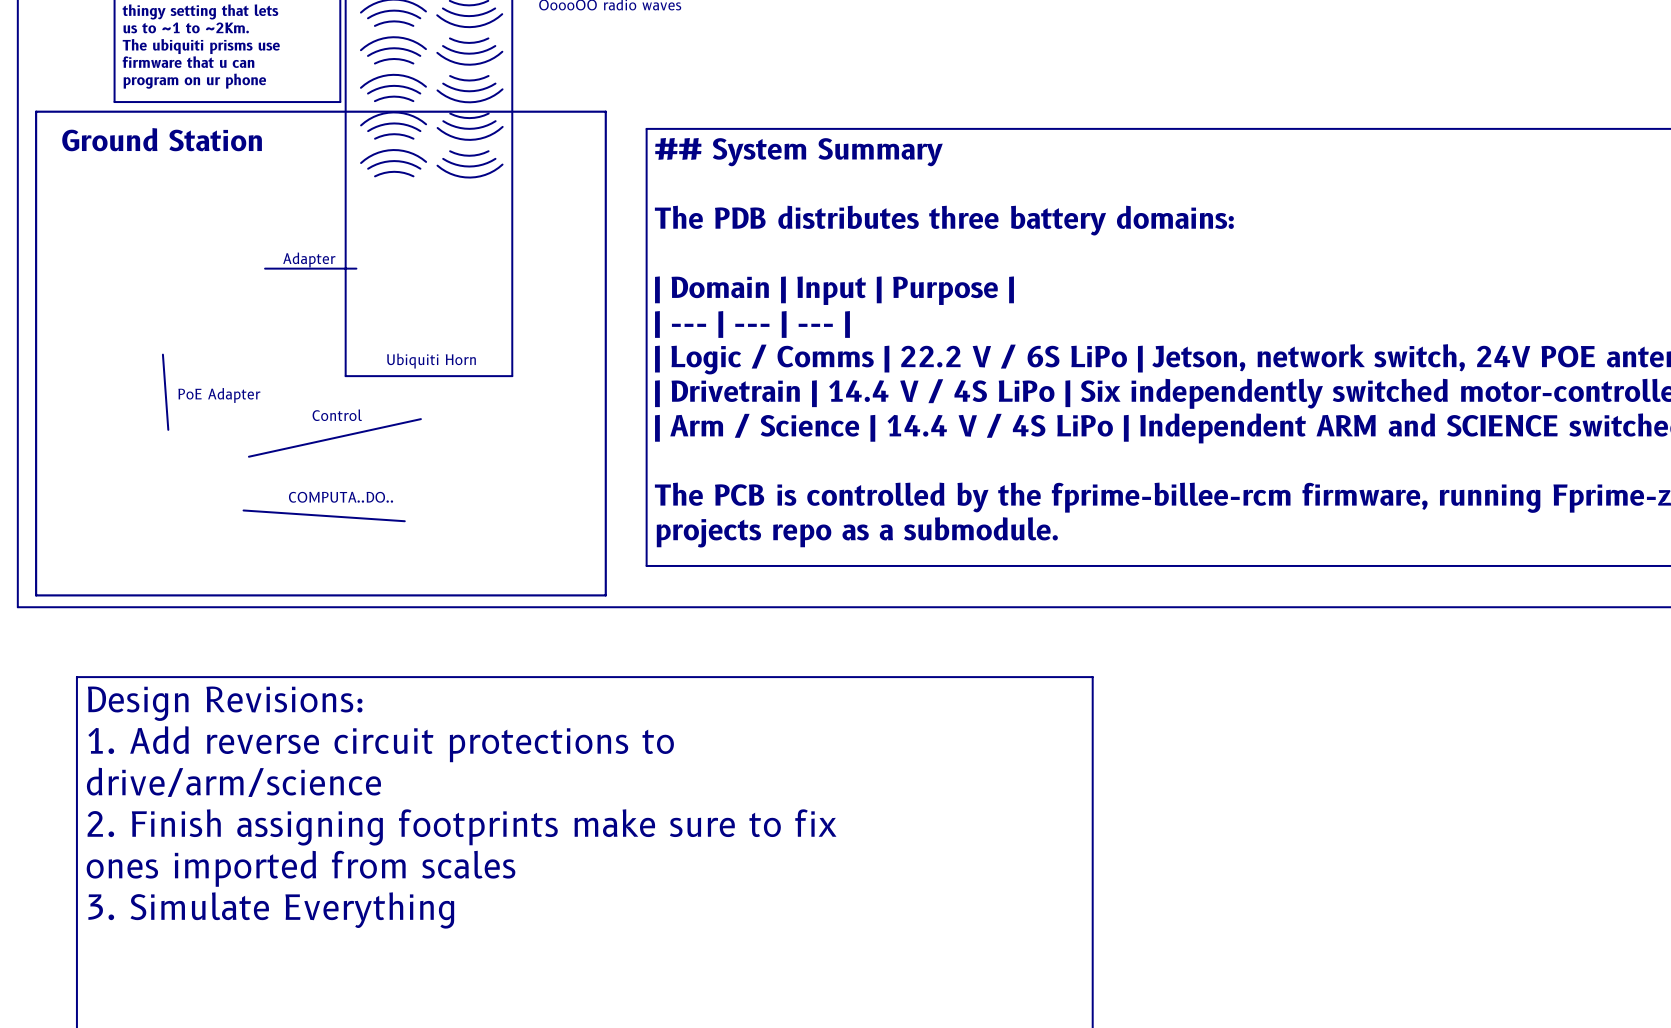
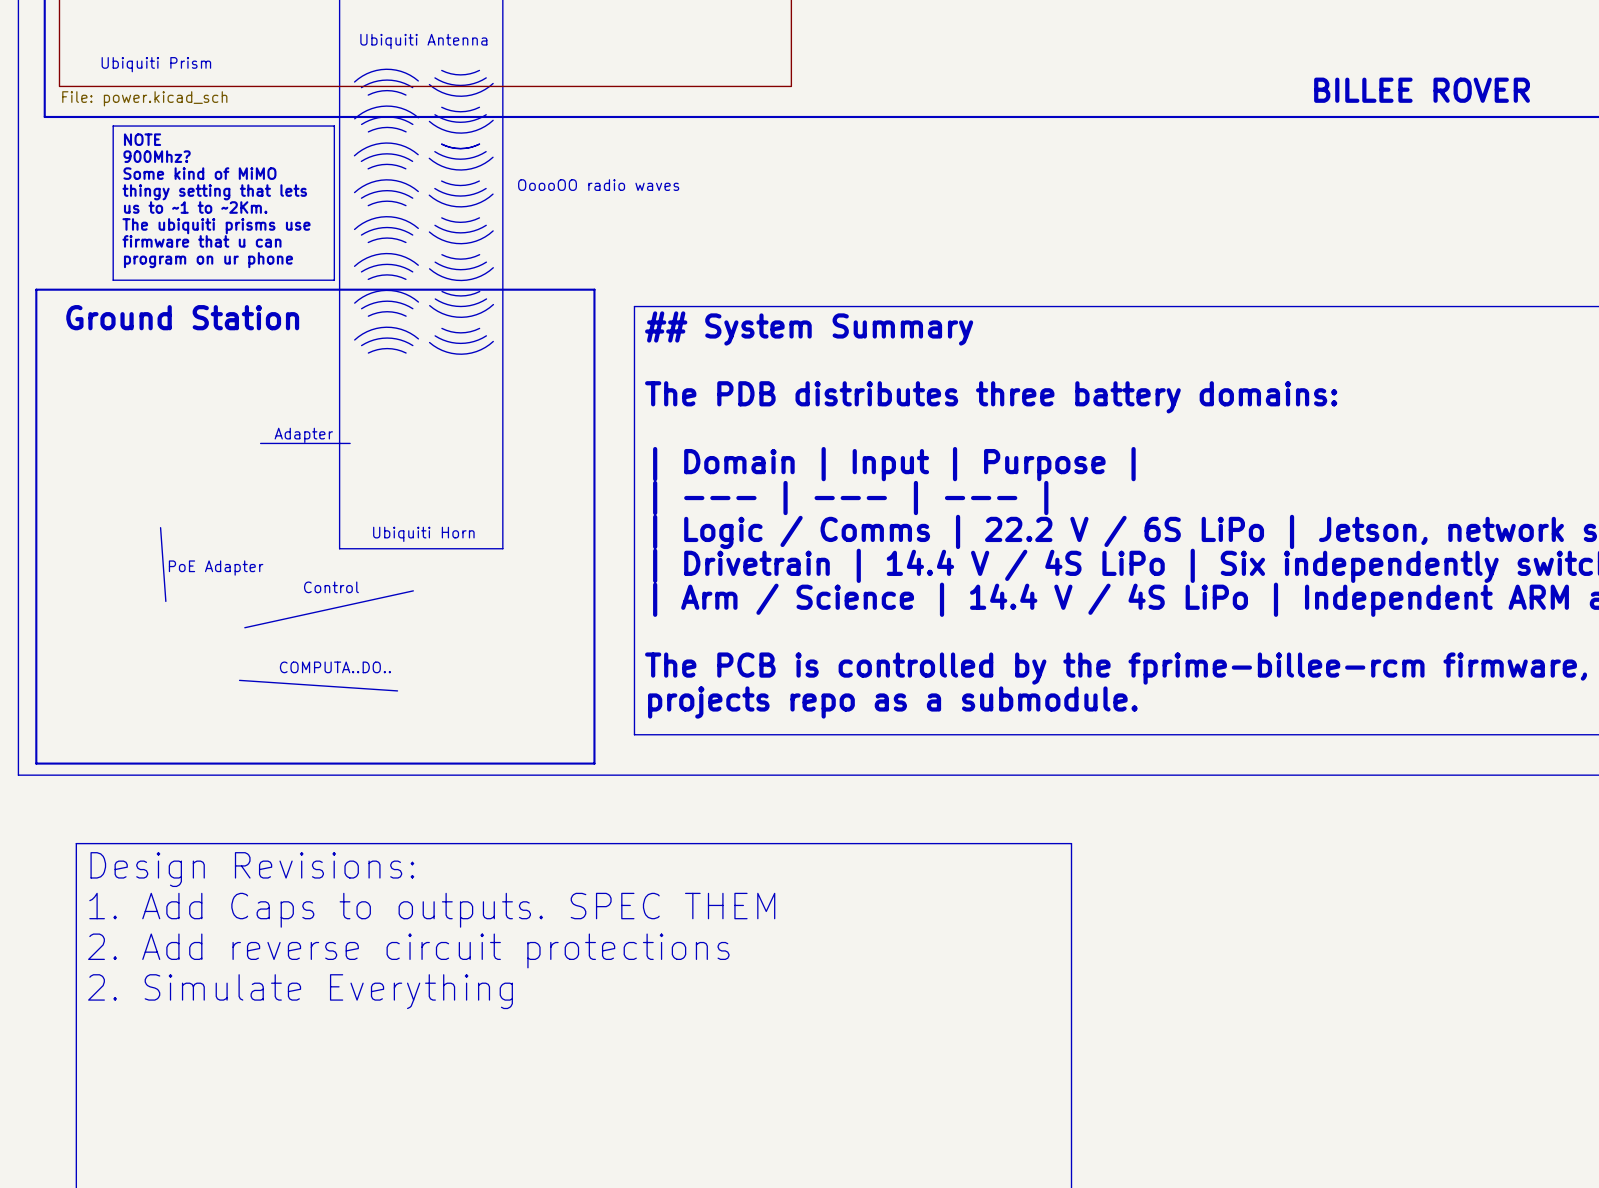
text: 1. Add reverse circuit protections to (381, 744) -> 1. Add Caps to outputs. SPEC THEM (432, 910)
text: drive/arm/science (233, 782) -> 2. Add reverse circuit protections (408, 950)
text: 2. Finish assigning footprints make sure to fix (462, 827) -> 2. Simulate Everything (300, 991)
text: ones imported from scales (301, 868) -> none
text: 3. Simulate Everything (271, 910) -> none

